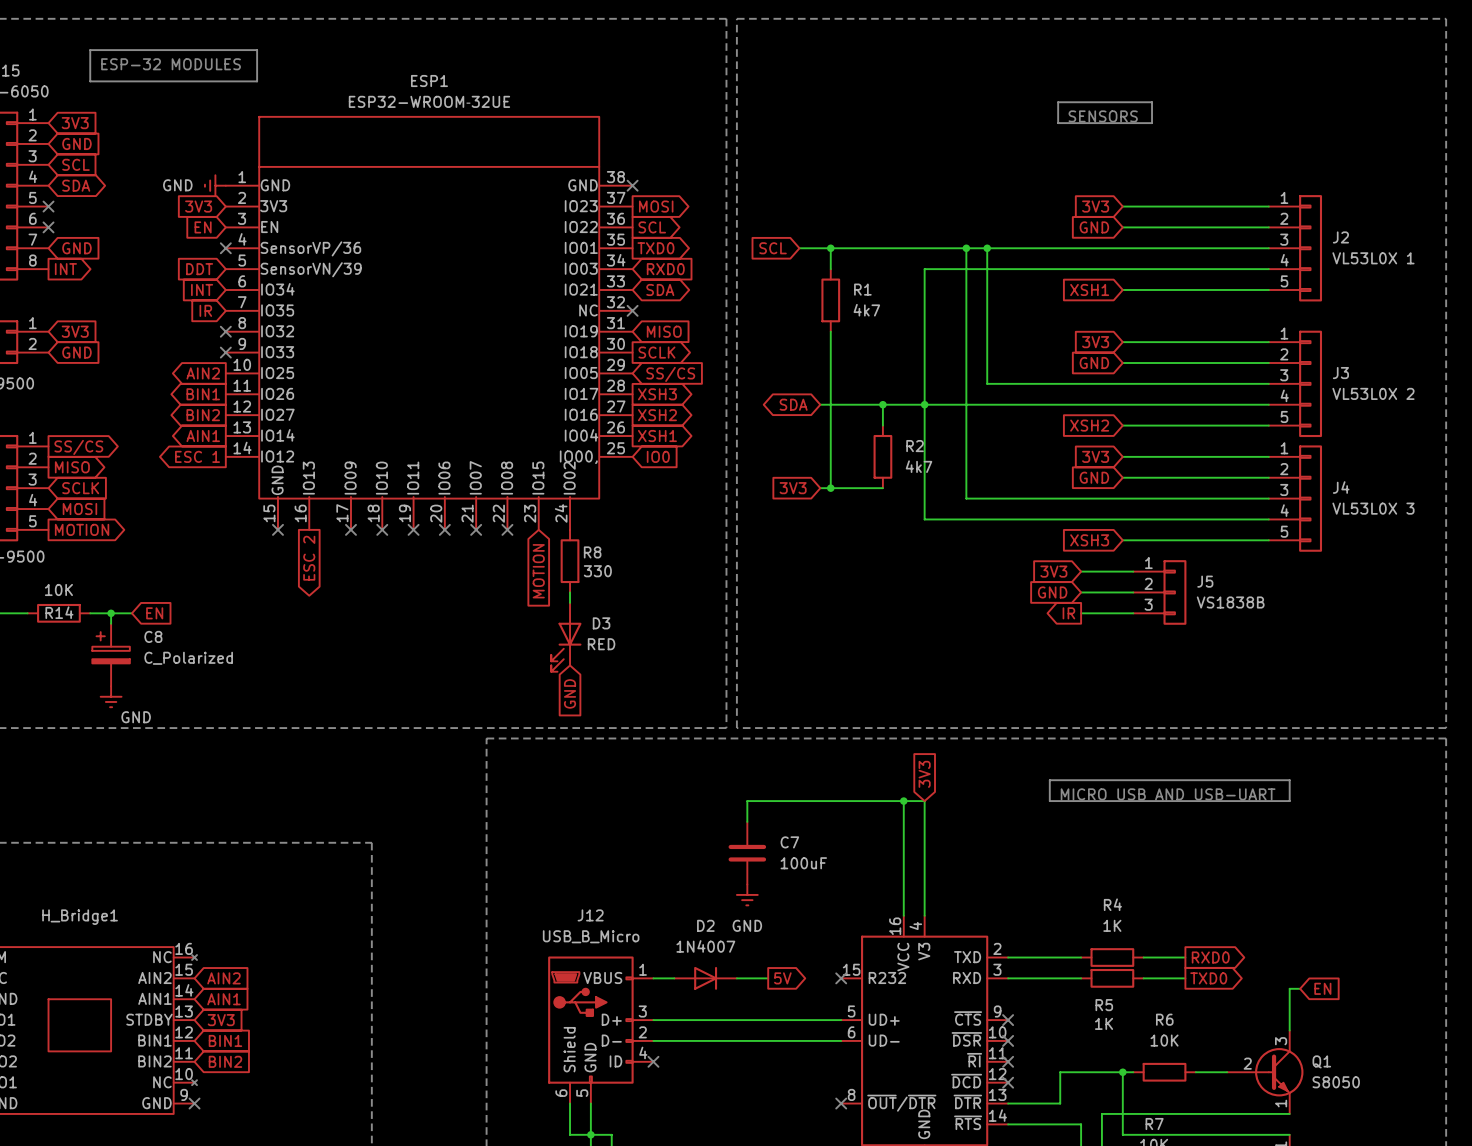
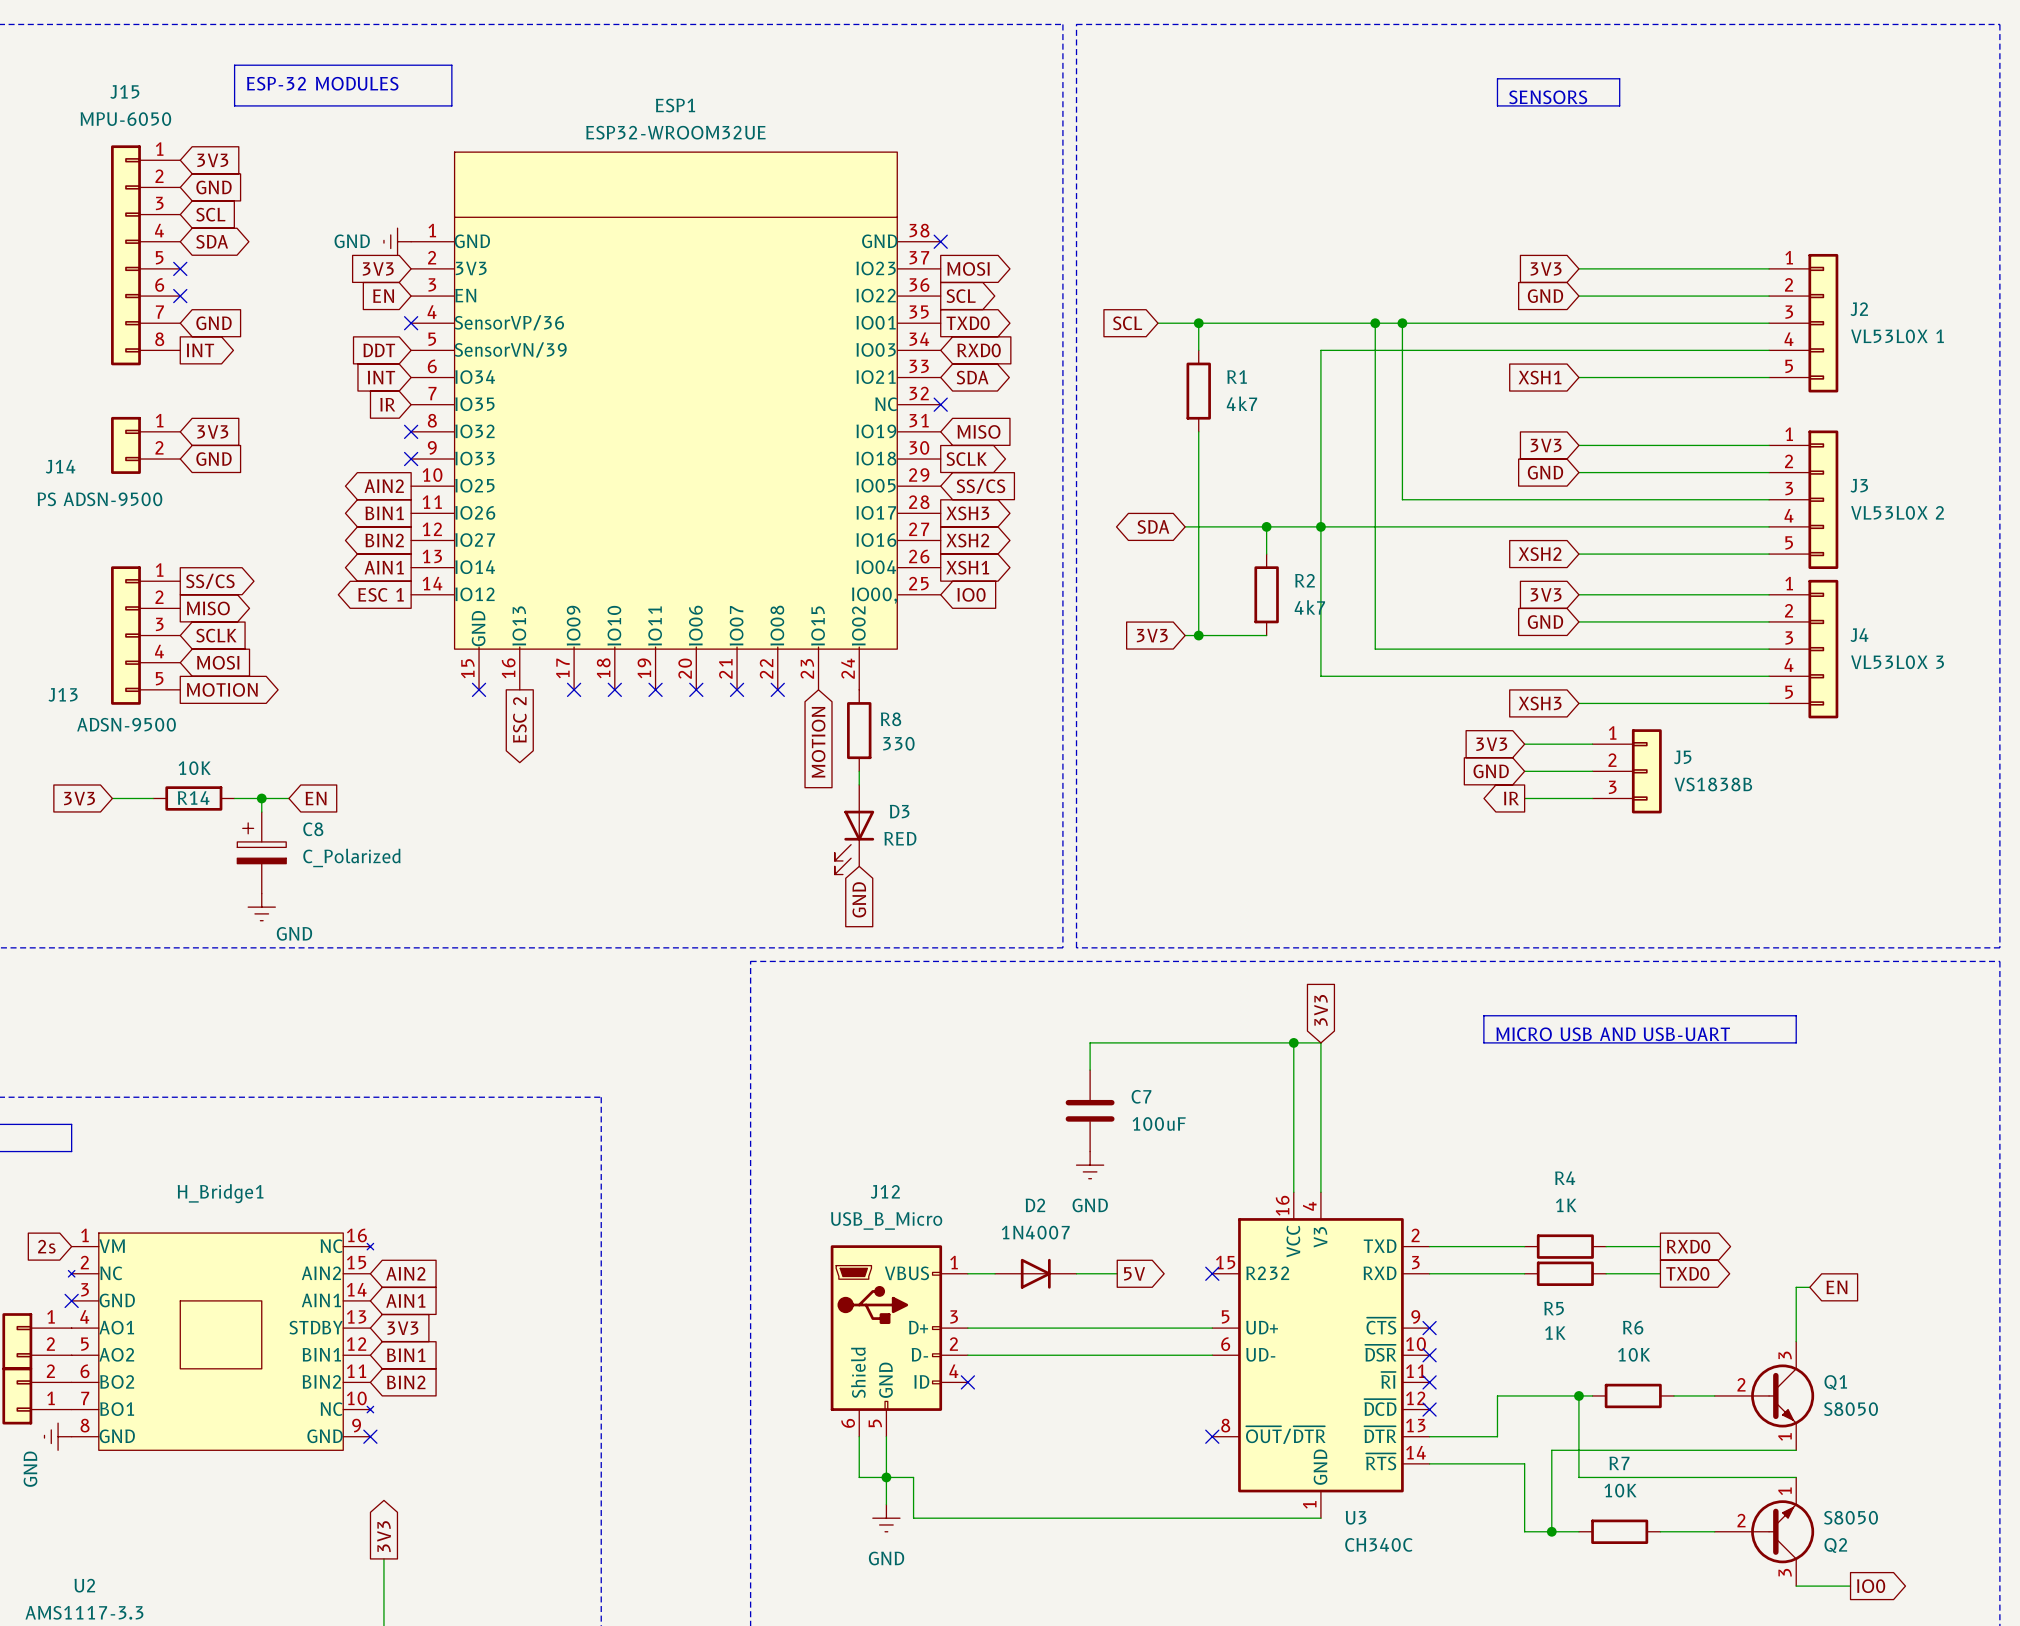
line: (1058, 102) (1152, 102) (1152, 123) (1058, 123) (1058, 102) -> (1497, 78) (1619, 78) (1619, 105) (1497, 105) (1497, 78)
text position: SENSORS (1103, 116) -> SENSORS (1548, 97)

